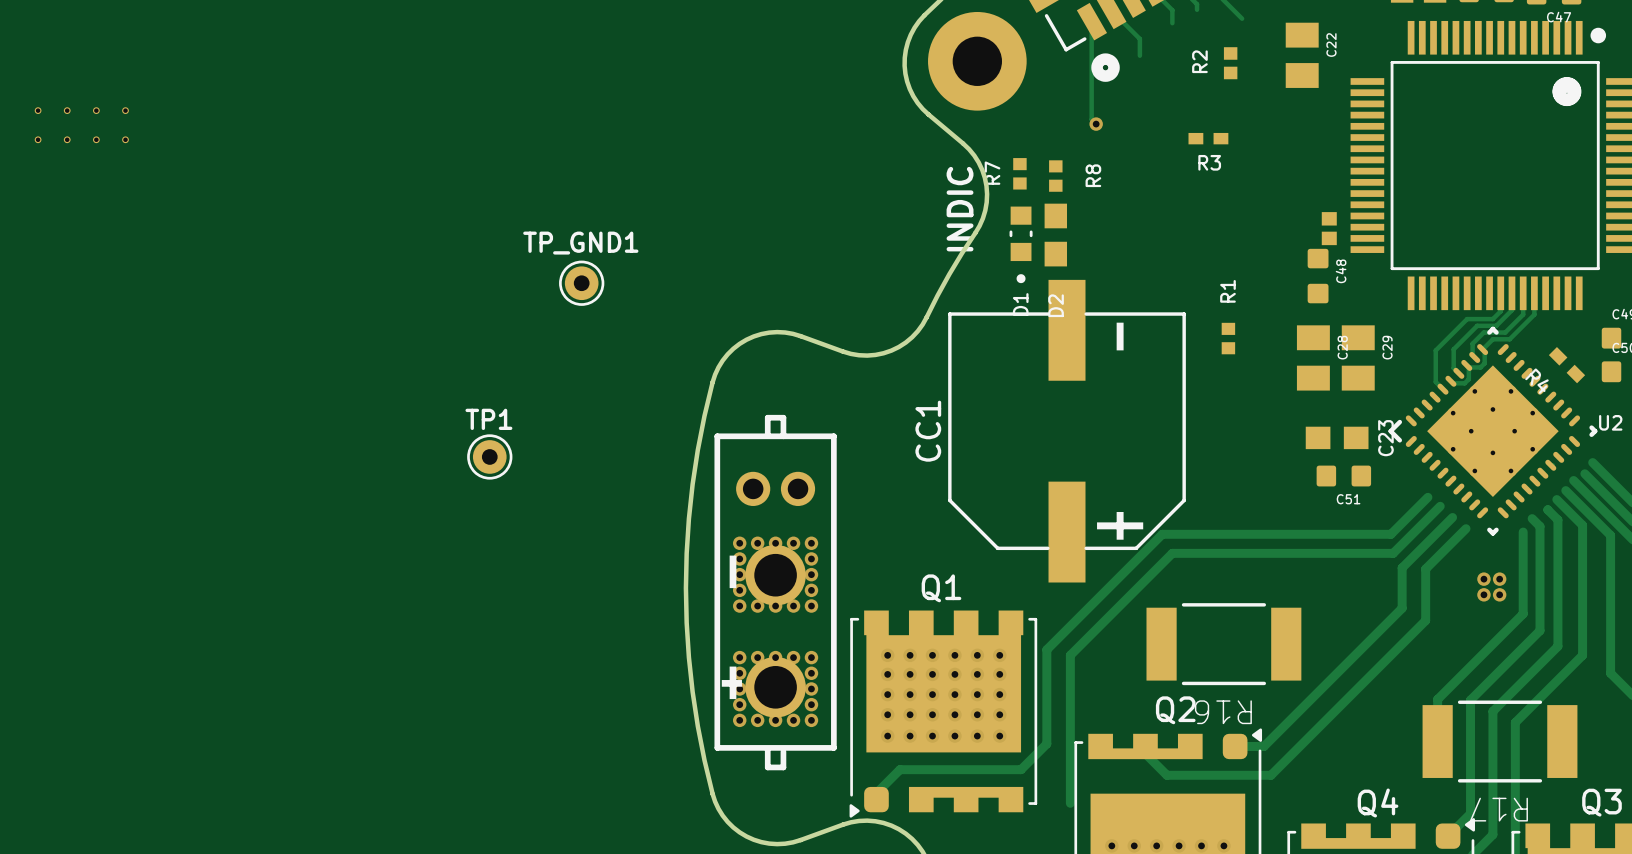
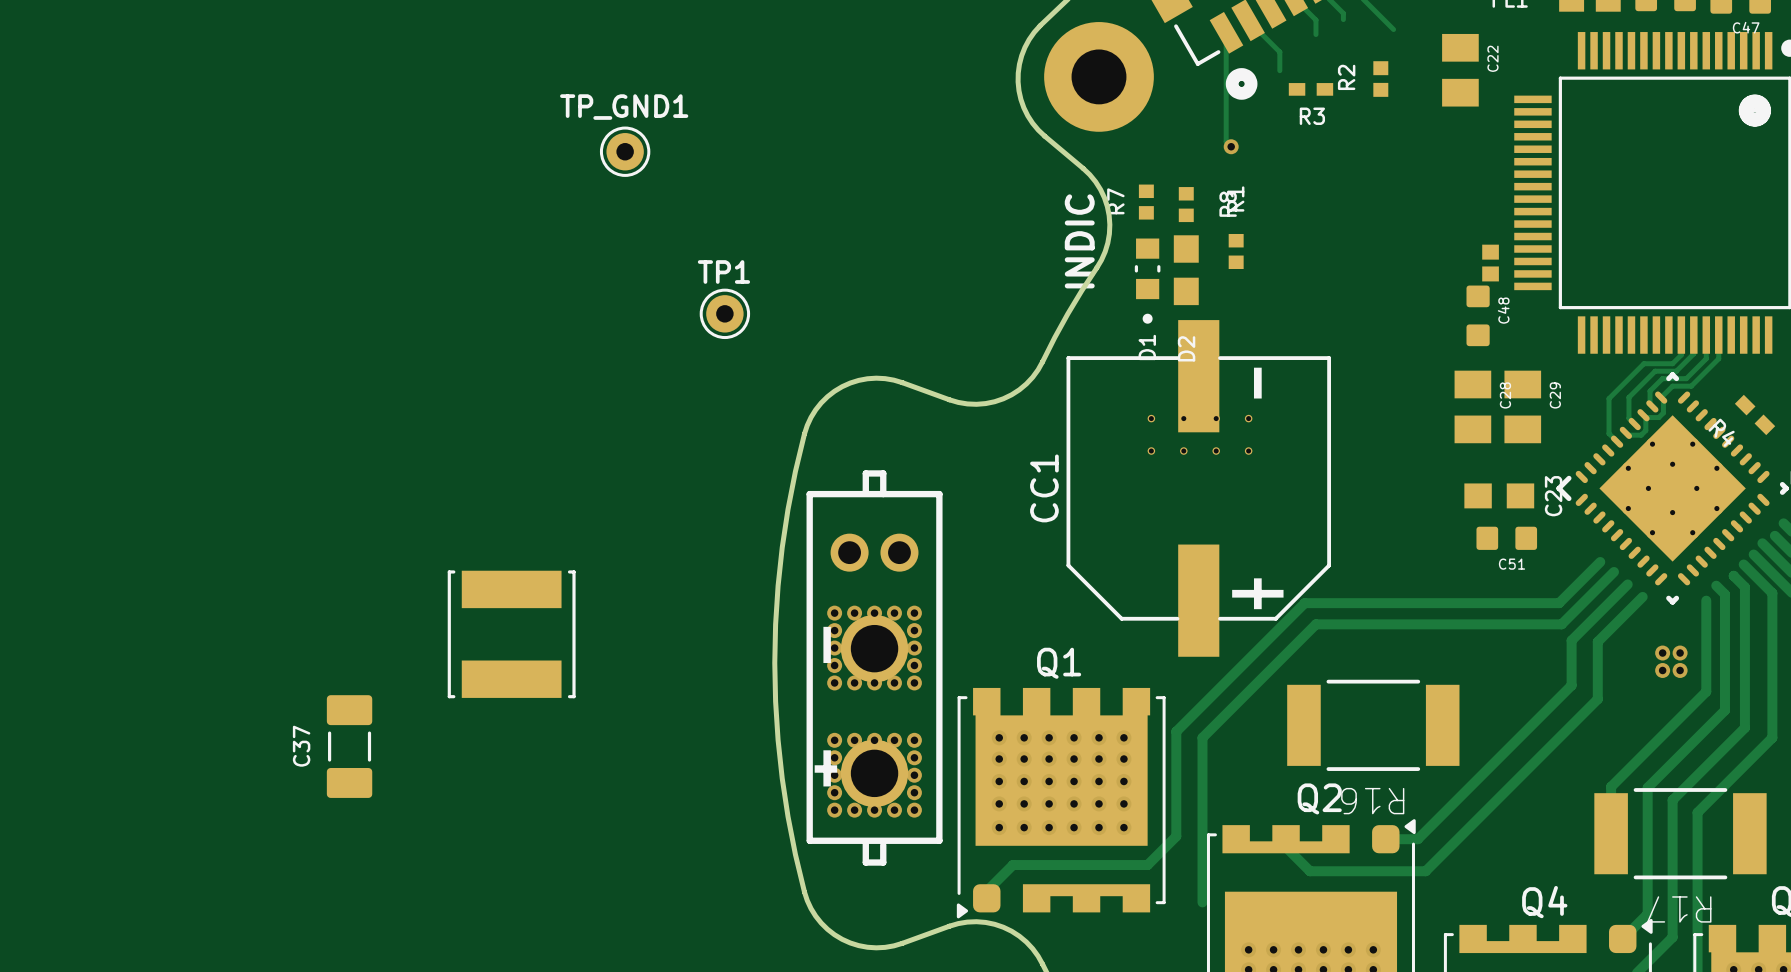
part: (81, 125) -> none
R3 position: (1208, 138) -> (1310, 89)
TP_GND1 position: (581, 283) -> (625, 151)
R1 position: (1228, 338) -> (1236, 251)
part: none -> (1200, 434)
TP1 position: (489, 456) -> (724, 313)
part: none -> (511, 634)
C37: none -> (349, 746)

